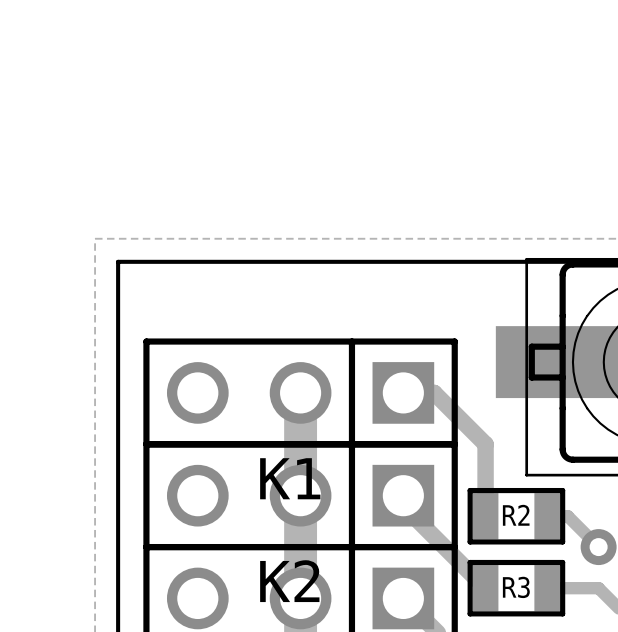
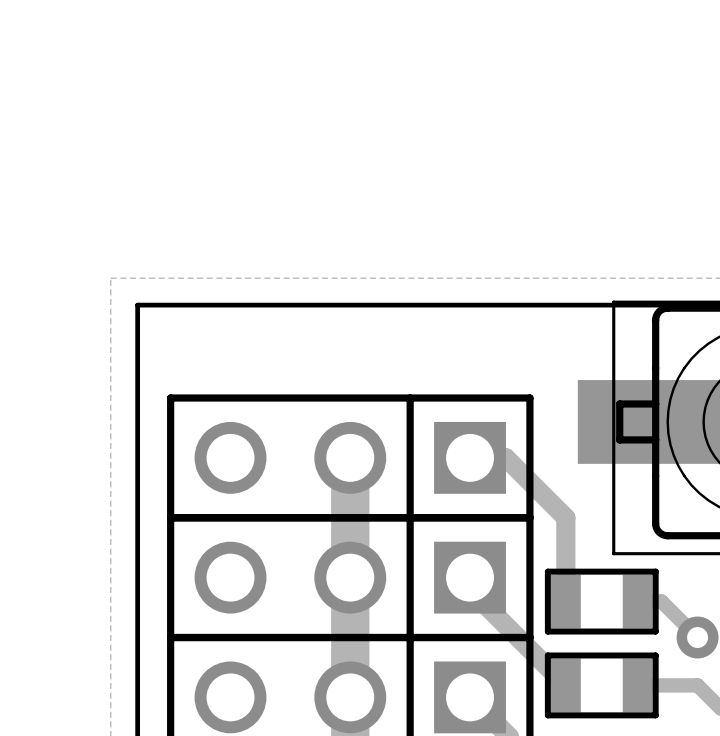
K1 name: K1 (290, 478) -> none
R2 name: R2 (516, 515) -> none
K2 name: K2 (289, 581) -> none
R3 name: R3 (516, 587) -> none

